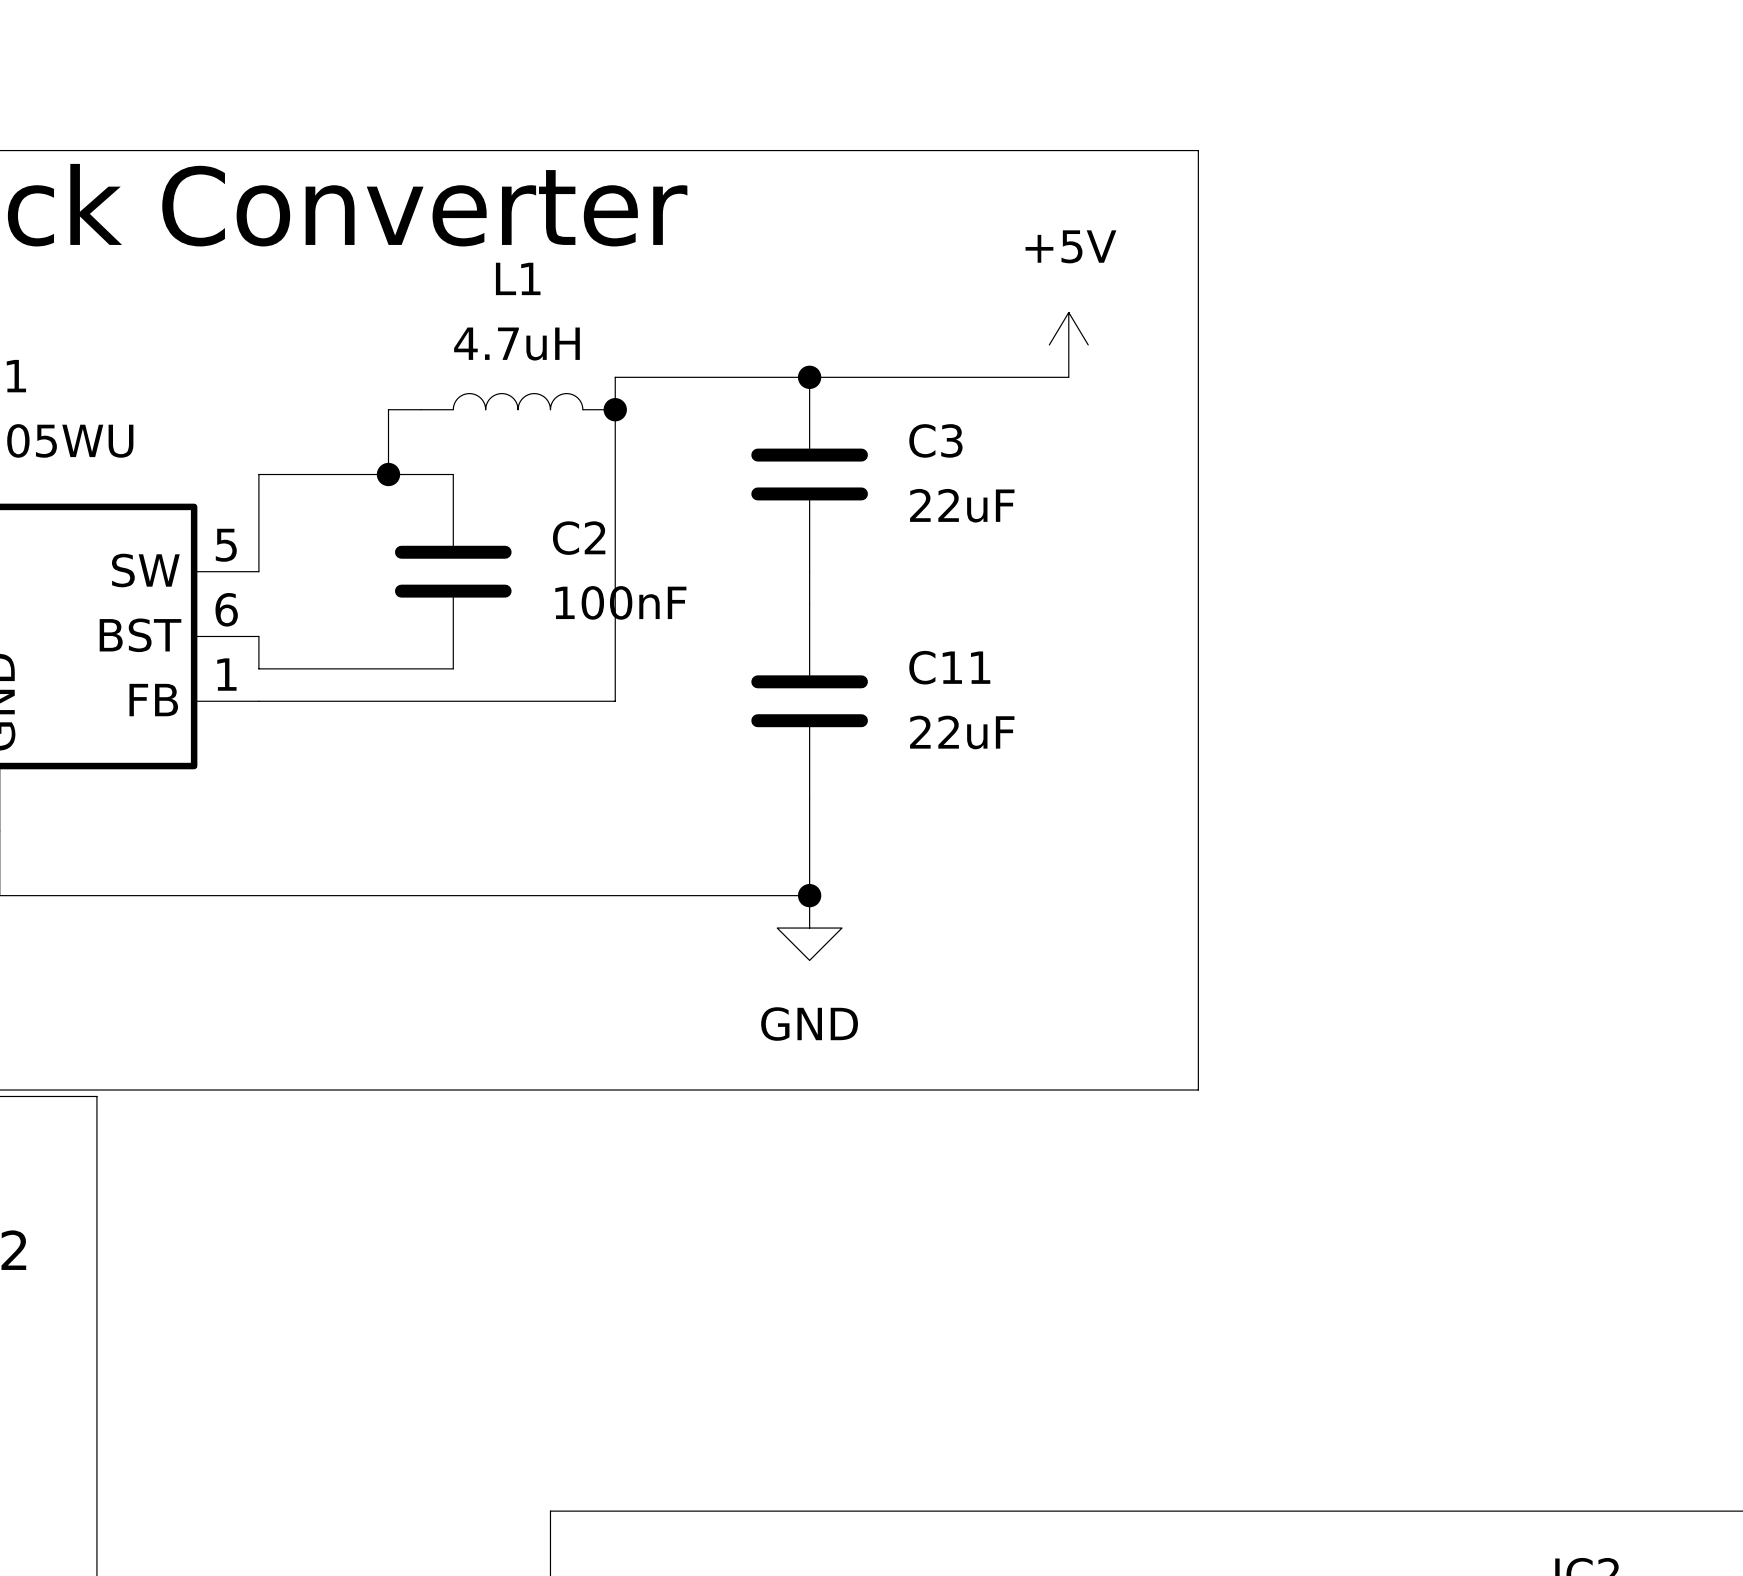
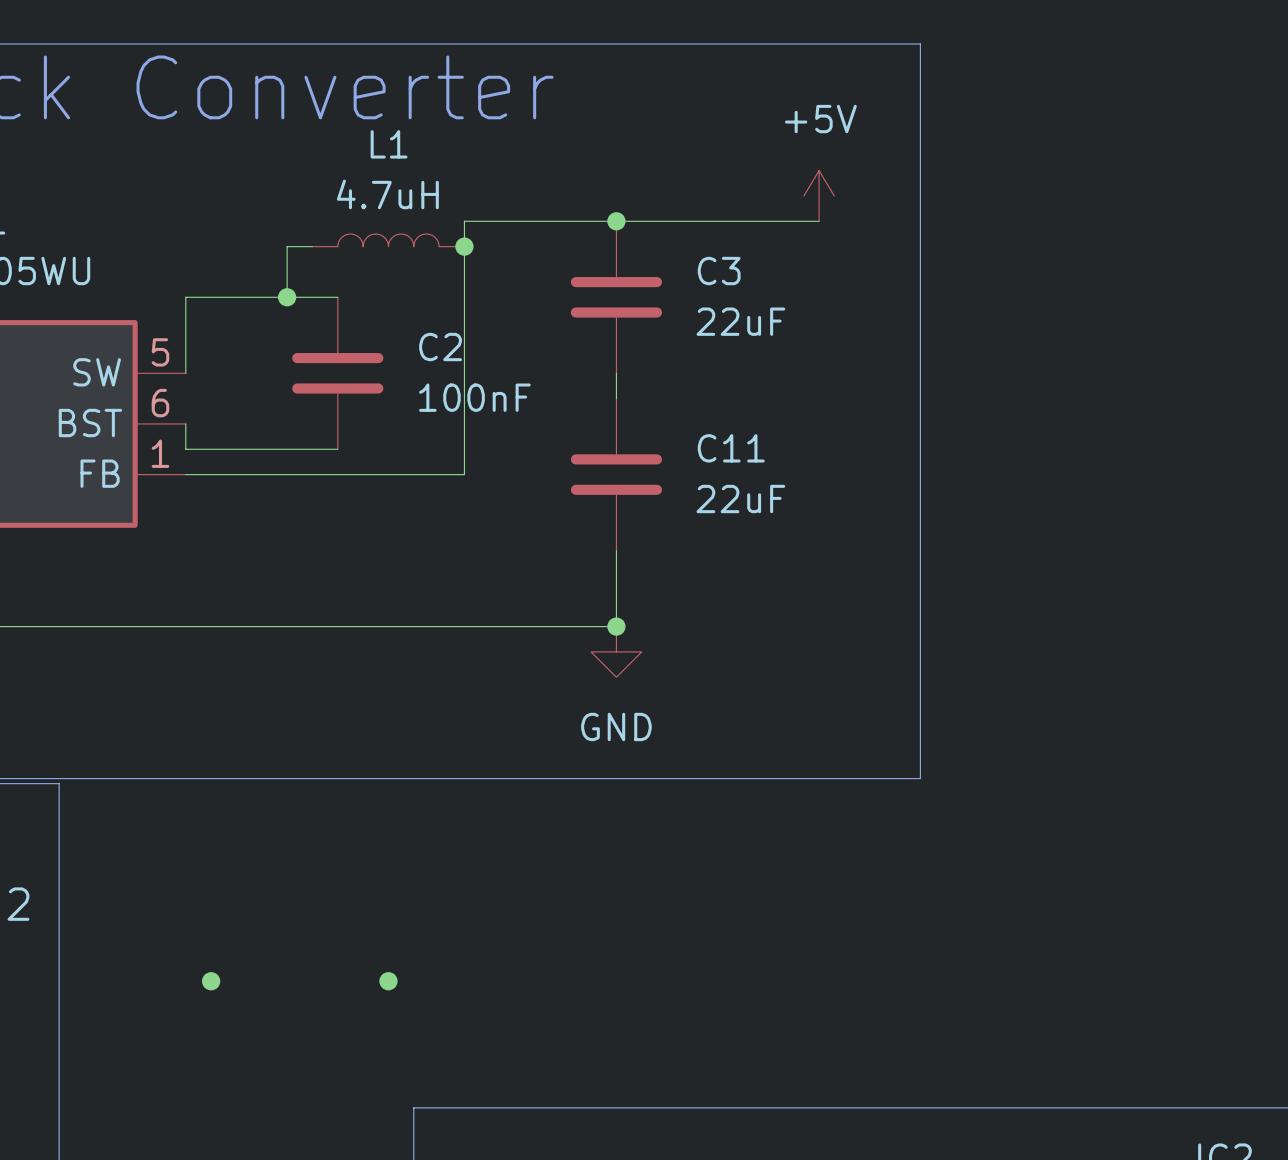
junction: none -> (211, 981)
junction: none -> (388, 981)

